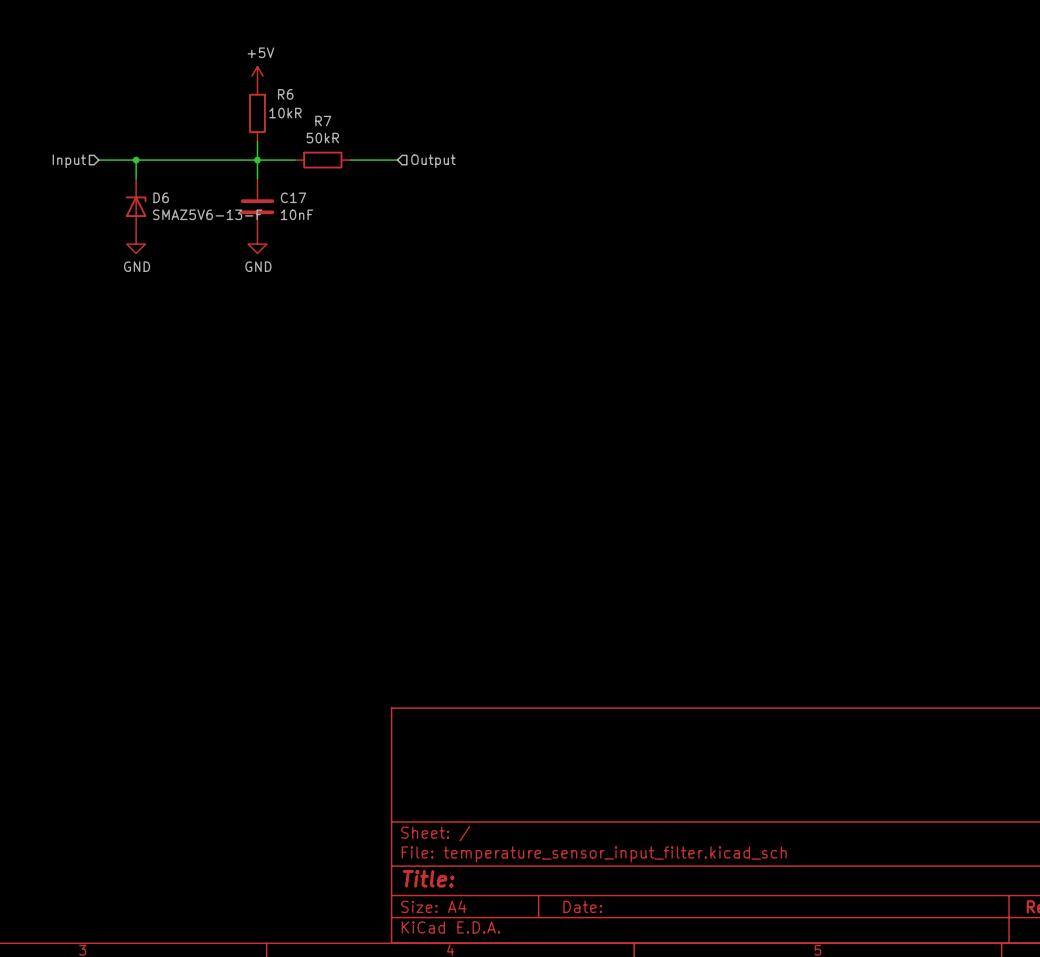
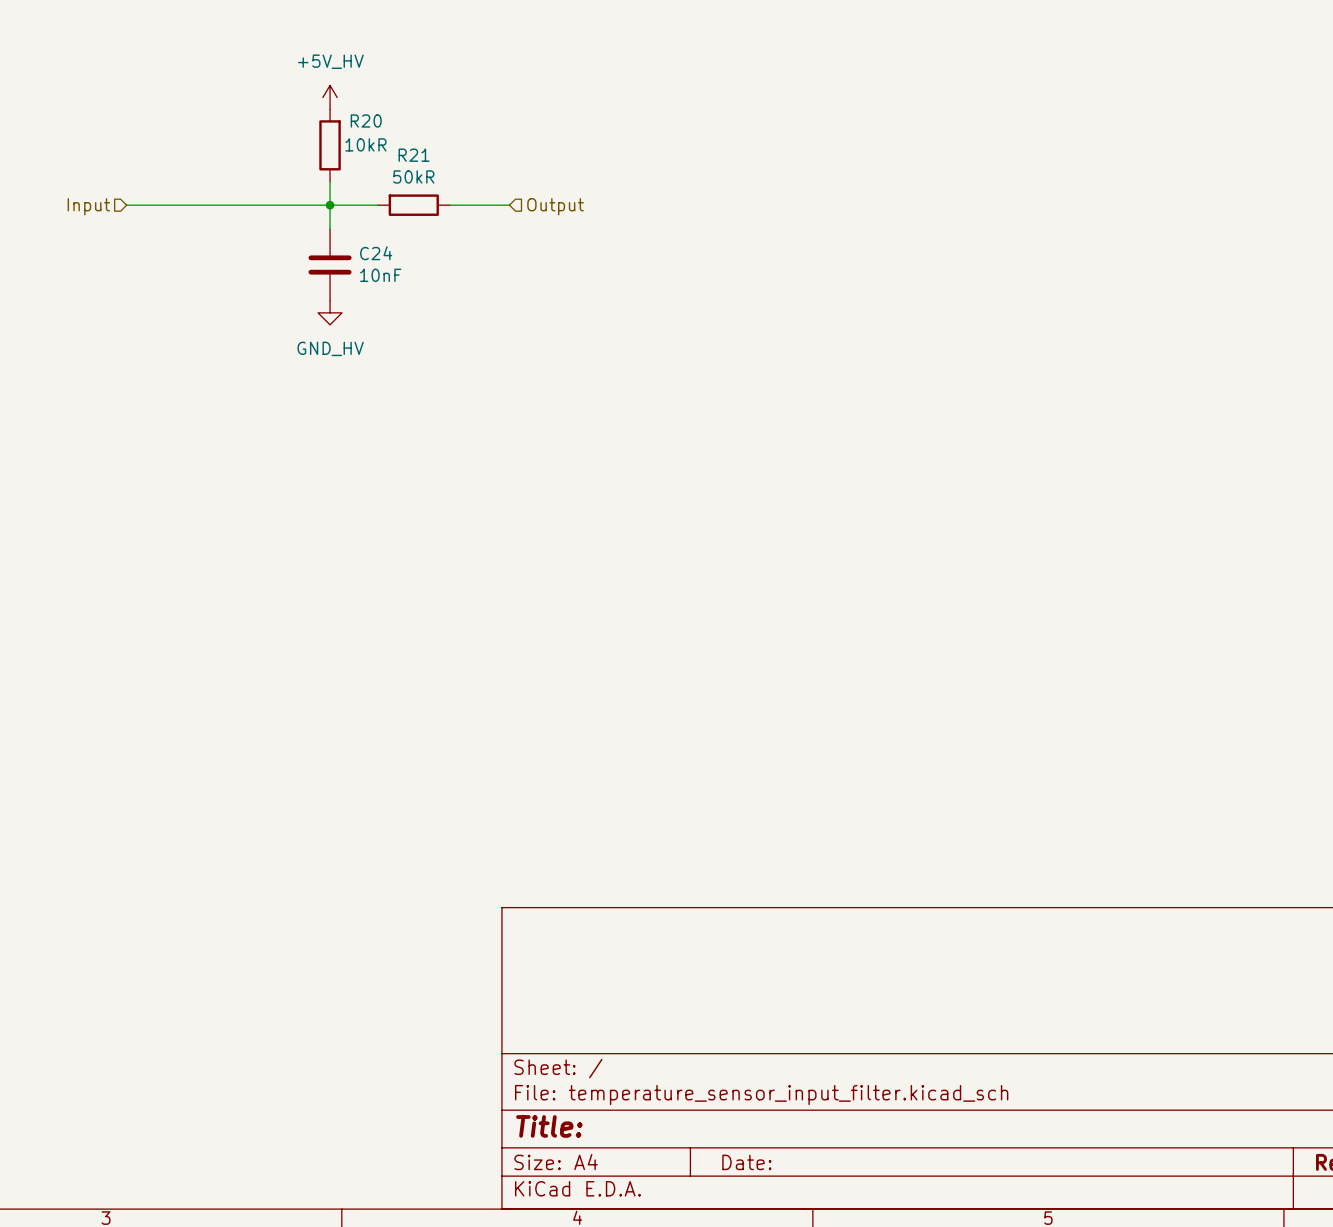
power symbol: +5V (257, 76) -> +5V_HV (330, 97)
R6 name: R6 (285, 94) -> R20 (366, 120)
R7 name: R7 (323, 121) -> R21 (414, 155)
wire: (136, 160) (136, 178) -> none
junction: (136, 160) -> none
C17 name: C17 (293, 197) -> C24 (376, 253)
D6: SMAZ5V6-13-F (136, 206) -> none
power symbol: GND (136, 244) -> none
power symbol: GND (257, 244) -> GND_HV (330, 312)

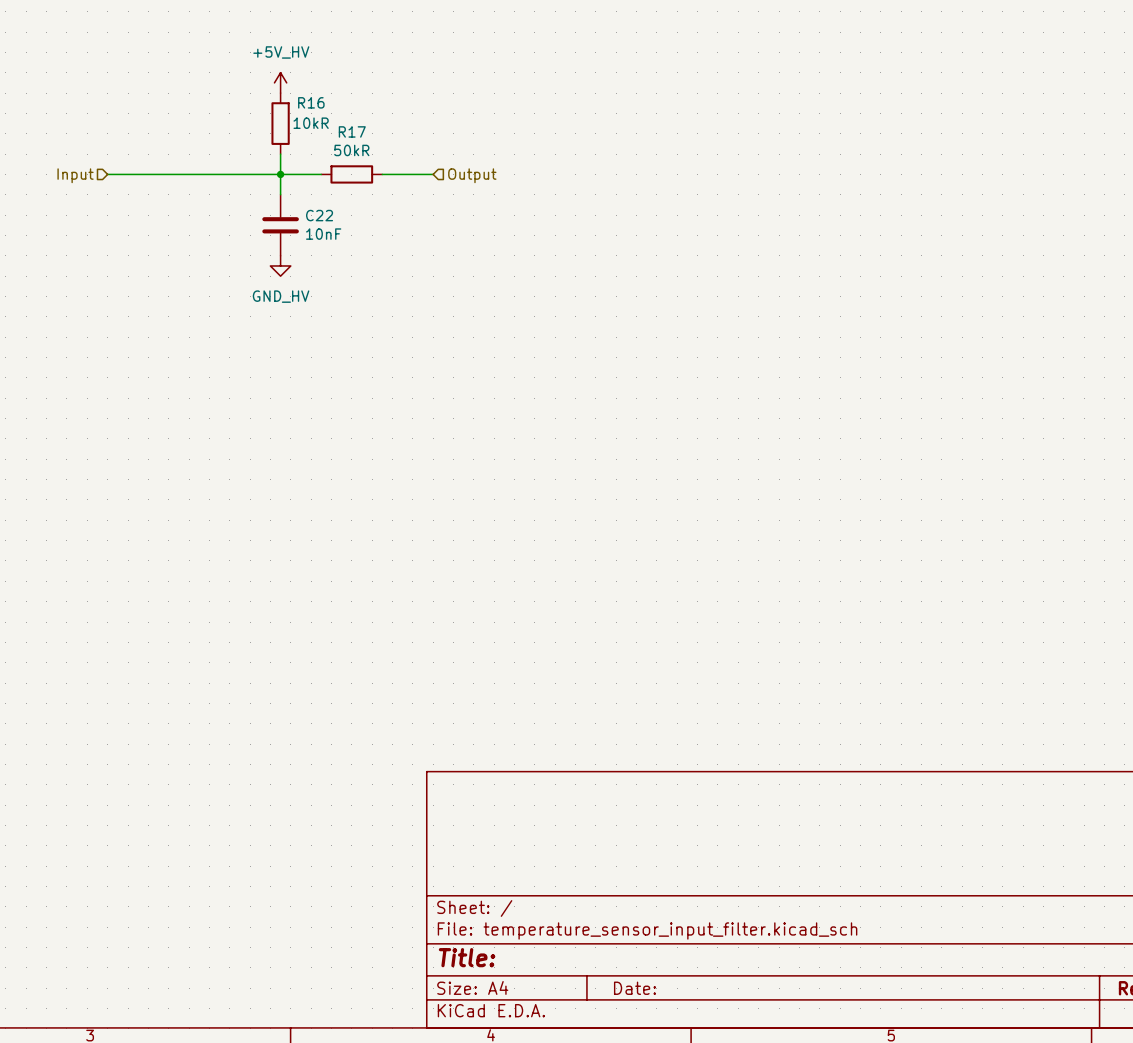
R20 name: R20 (366, 120) -> R16 (311, 102)
R21 name: R21 (414, 155) -> R17 (352, 131)
C24 name: C24 (376, 253) -> C22 (319, 215)

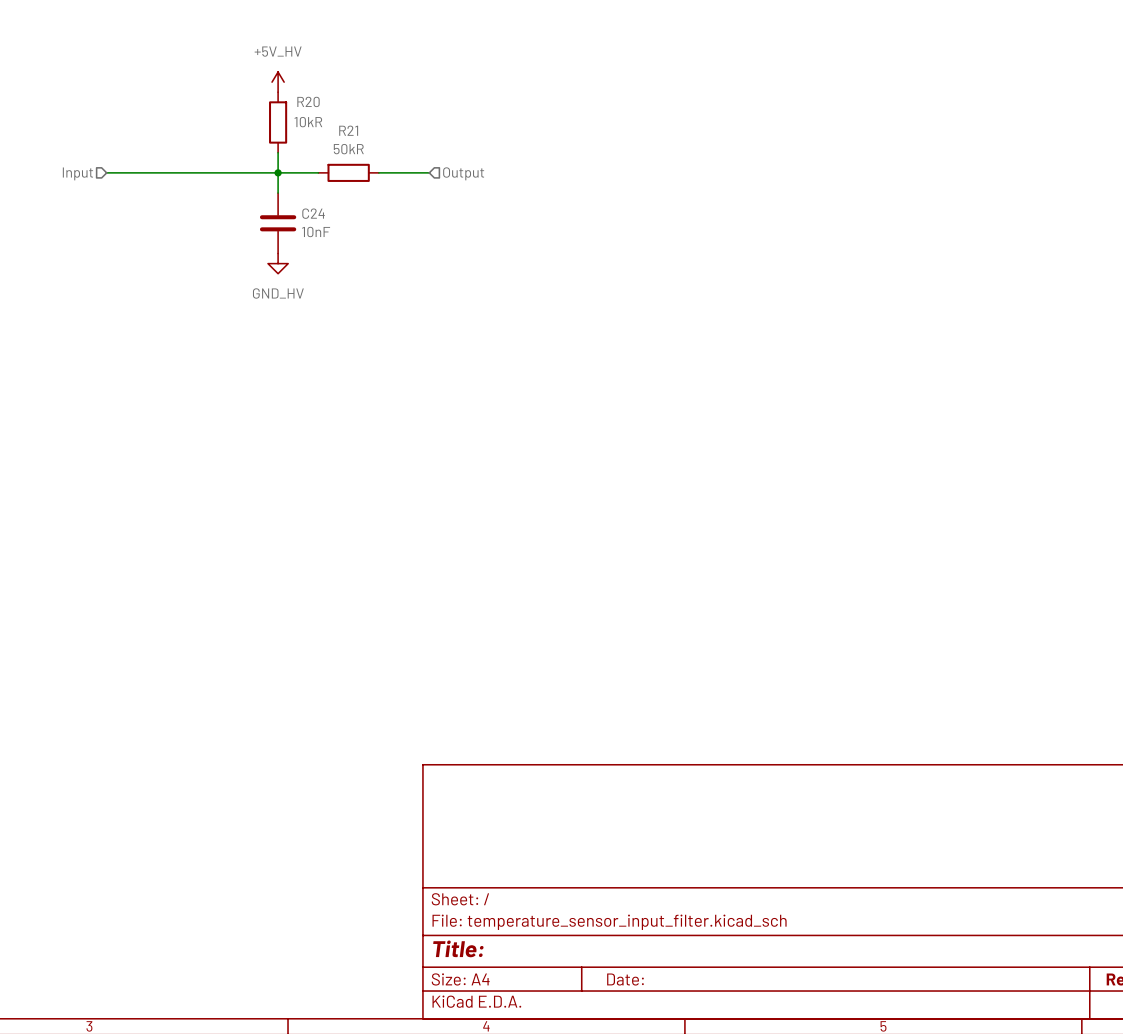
R16 name: R16 (311, 102) -> R20 (308, 101)
R17 name: R17 (352, 131) -> R21 (348, 130)
C22 name: C22 (319, 215) -> C24 (313, 213)

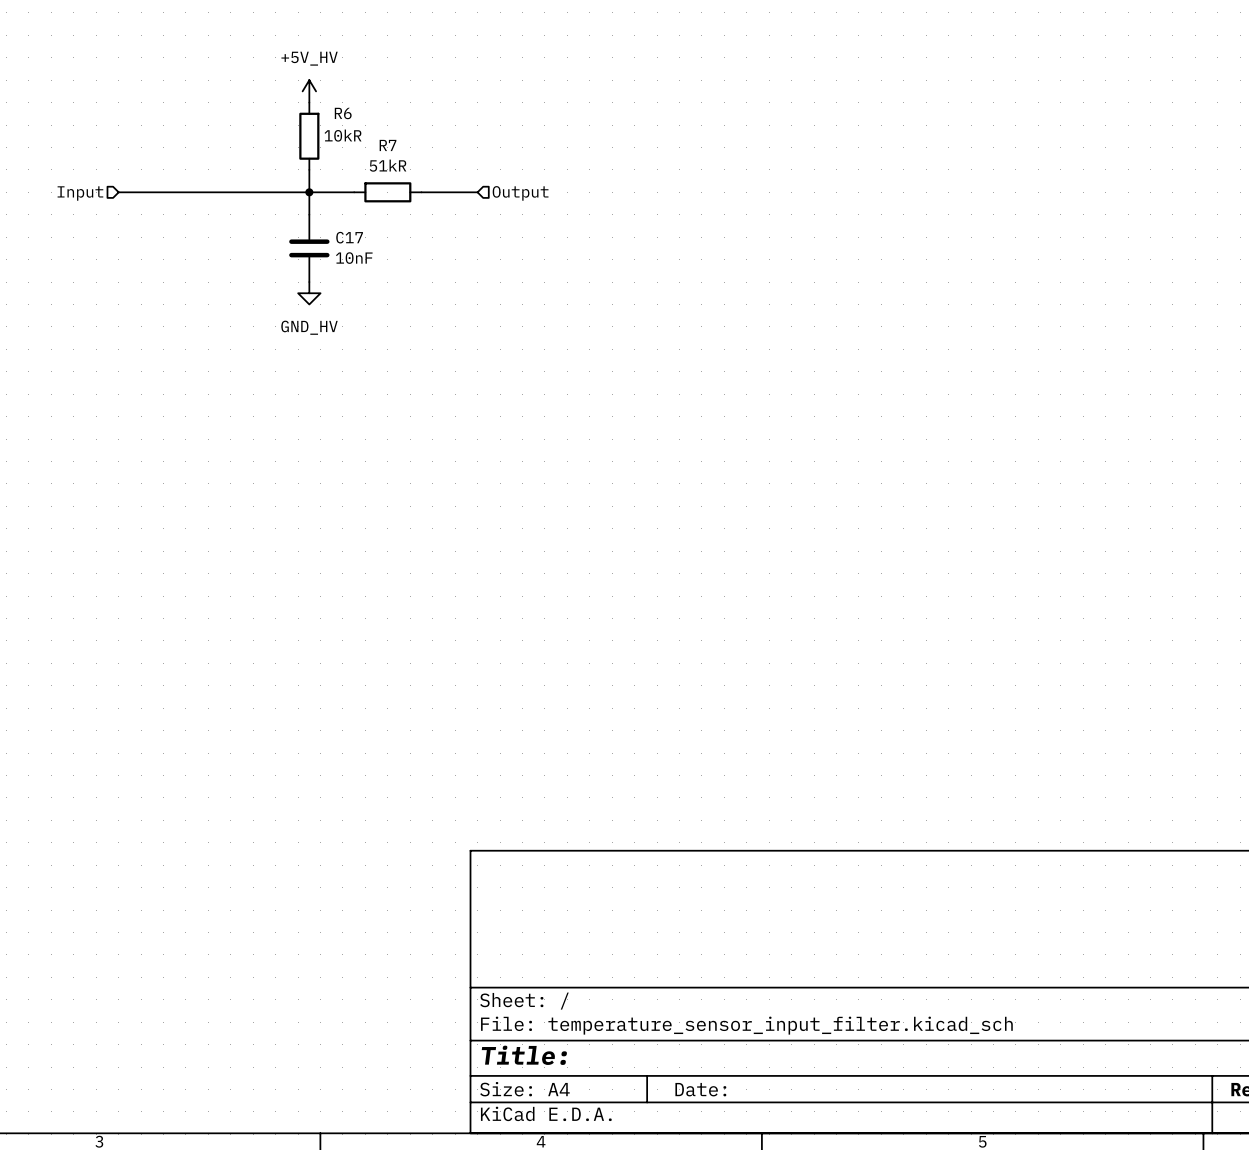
R20 name: R20 (308, 101) -> R6 (343, 113)
R21 name: R21 (348, 130) -> R7 (388, 145)
R21 value: 50kR (348, 149) -> 51kR (388, 165)
C24 name: C24 (313, 213) -> C17 (349, 237)

